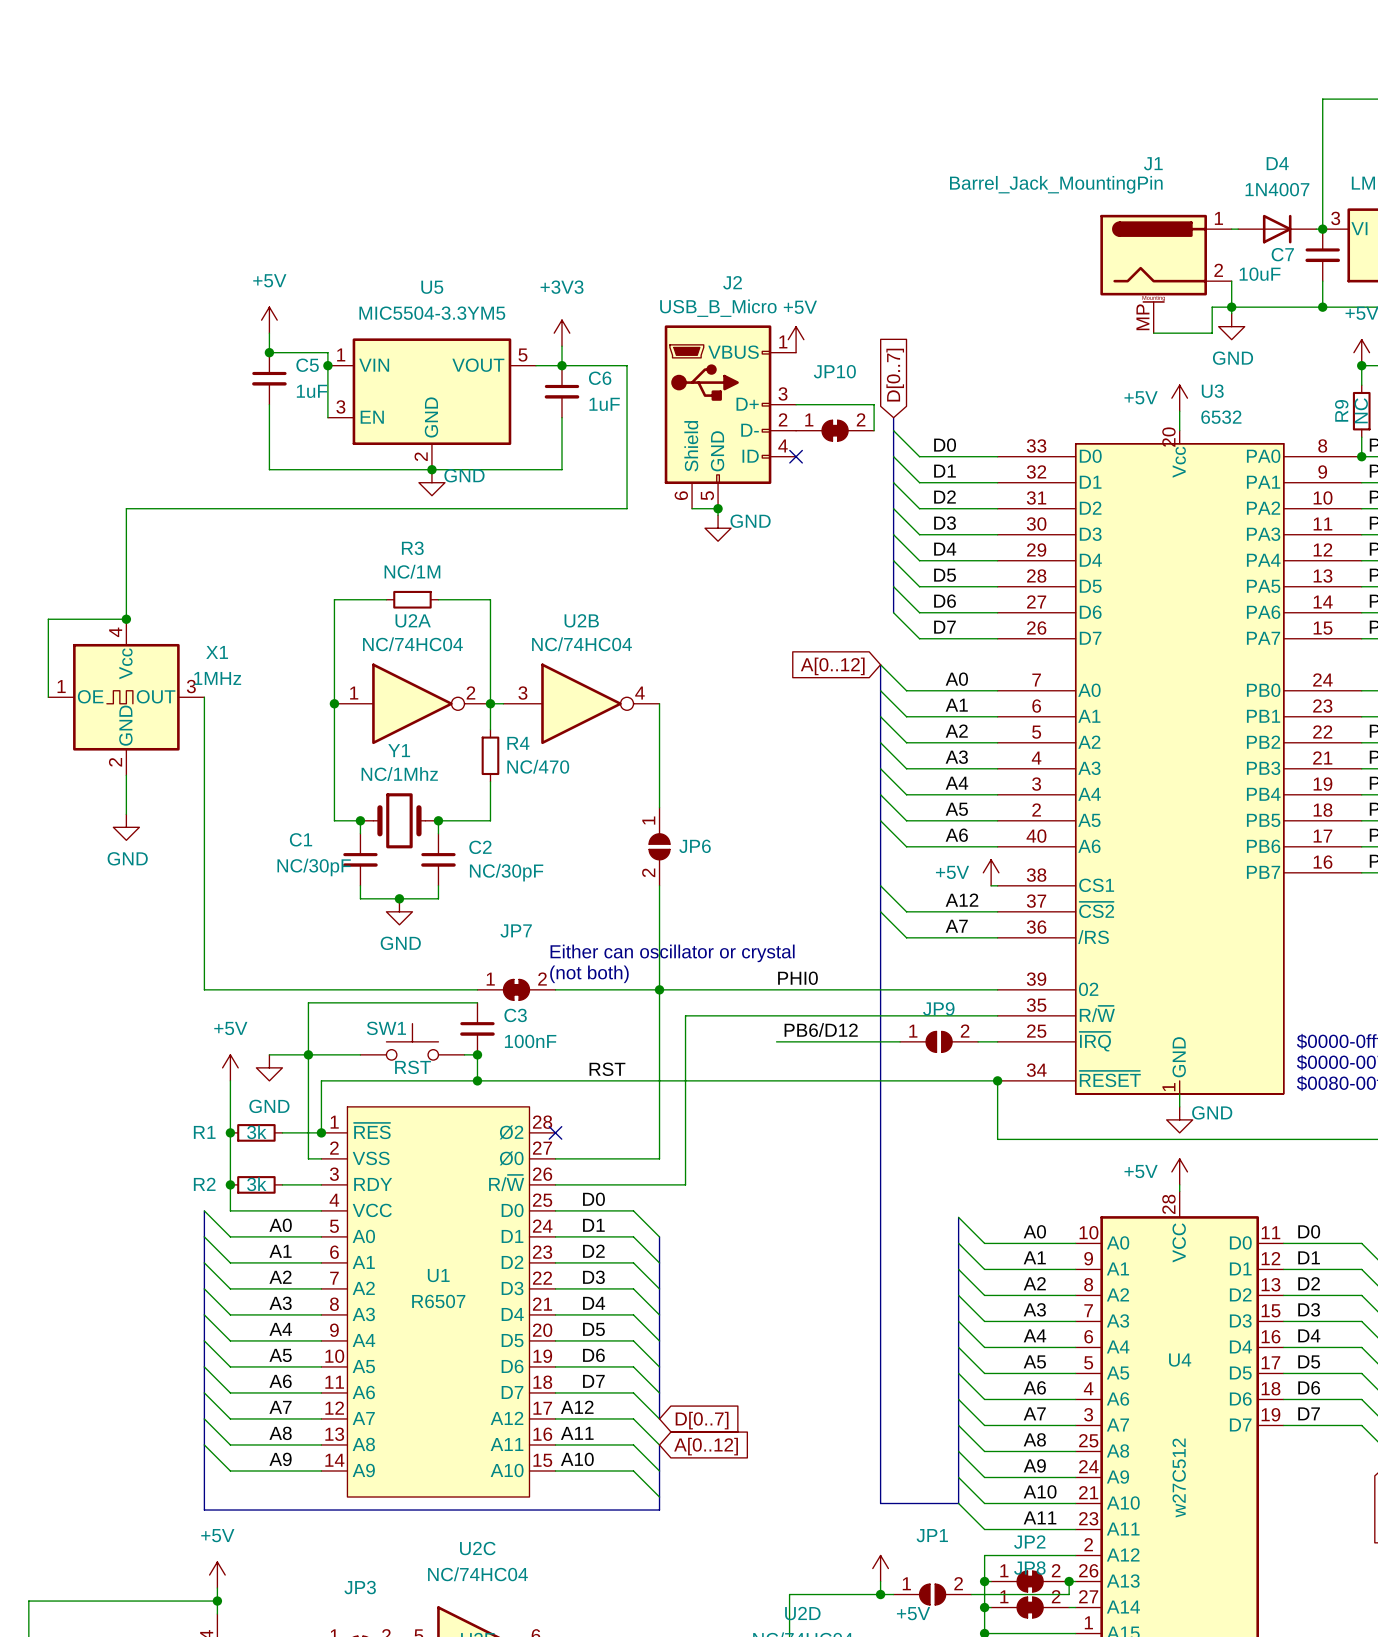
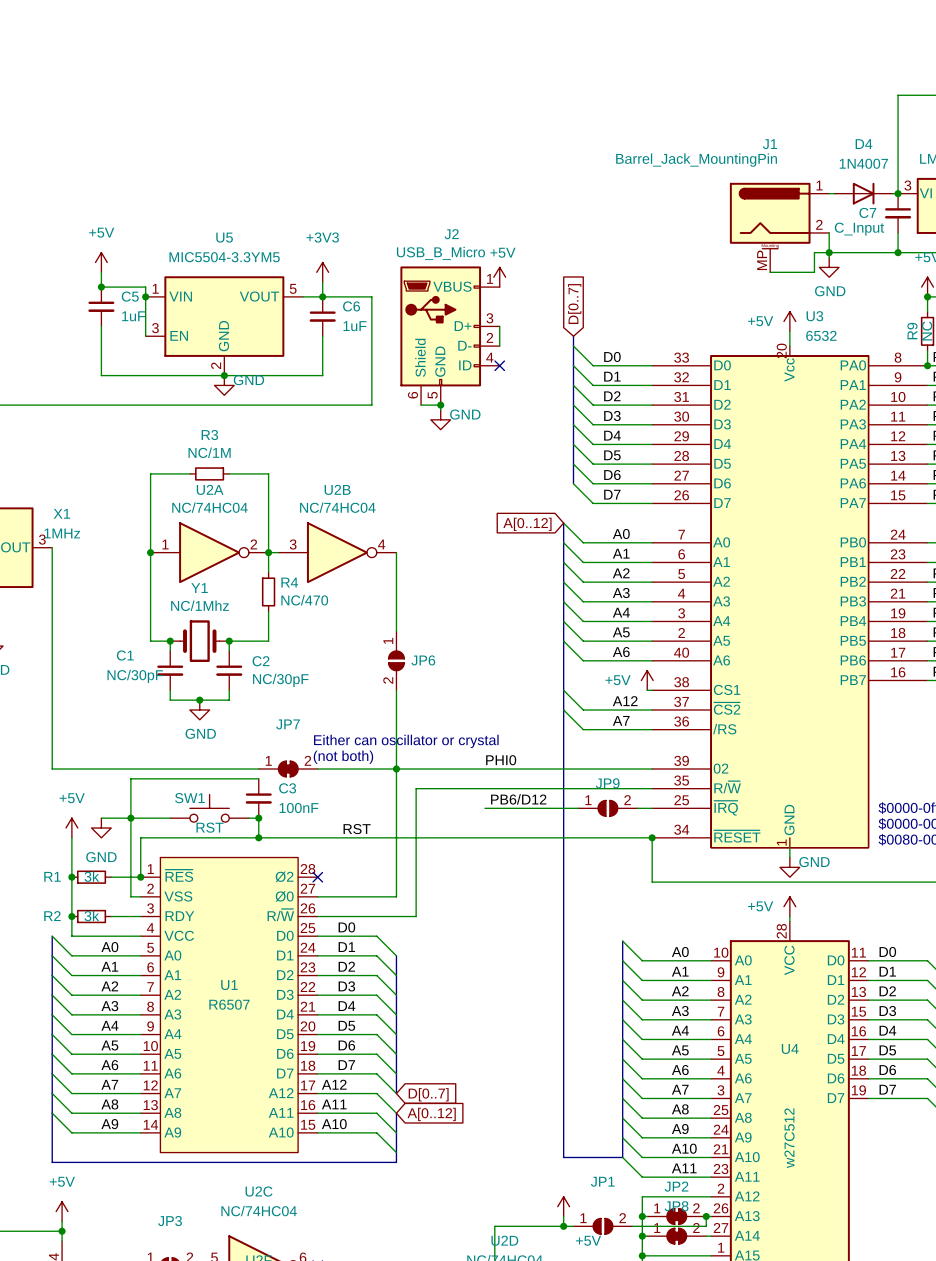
C7 value: 10uF (1260, 274) -> C_Input (859, 229)
wire: (796, 404) (874, 404) (874, 430) -> (499, 326) (499, 346)
JP10: (835, 430) -> none

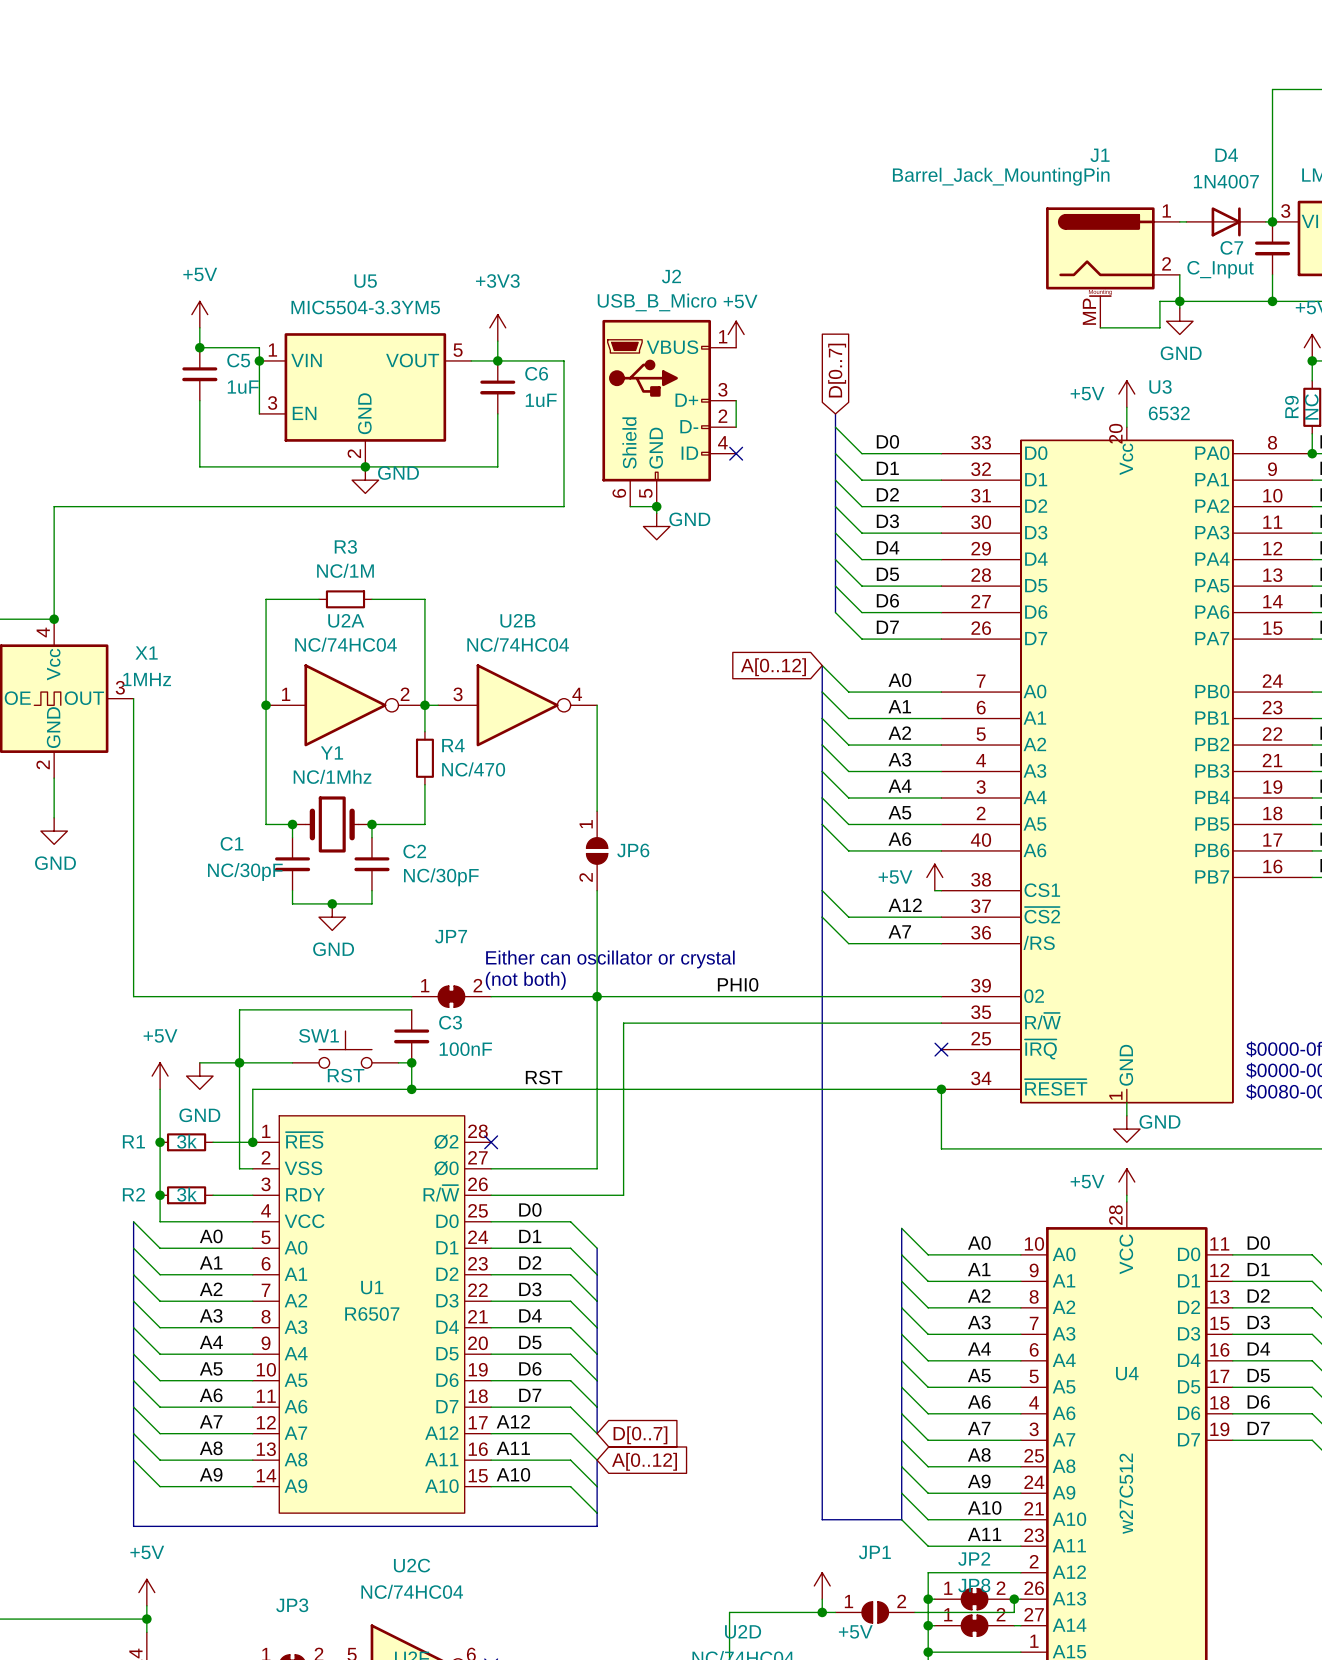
label: PB6/D12 (518, 799) -> none
wire: (484, 808) (578, 808) -> none
JP9: (607, 808) -> none
wire: (637, 808) (652, 808) -> none
no-connect mark: none -> (941, 1049)

